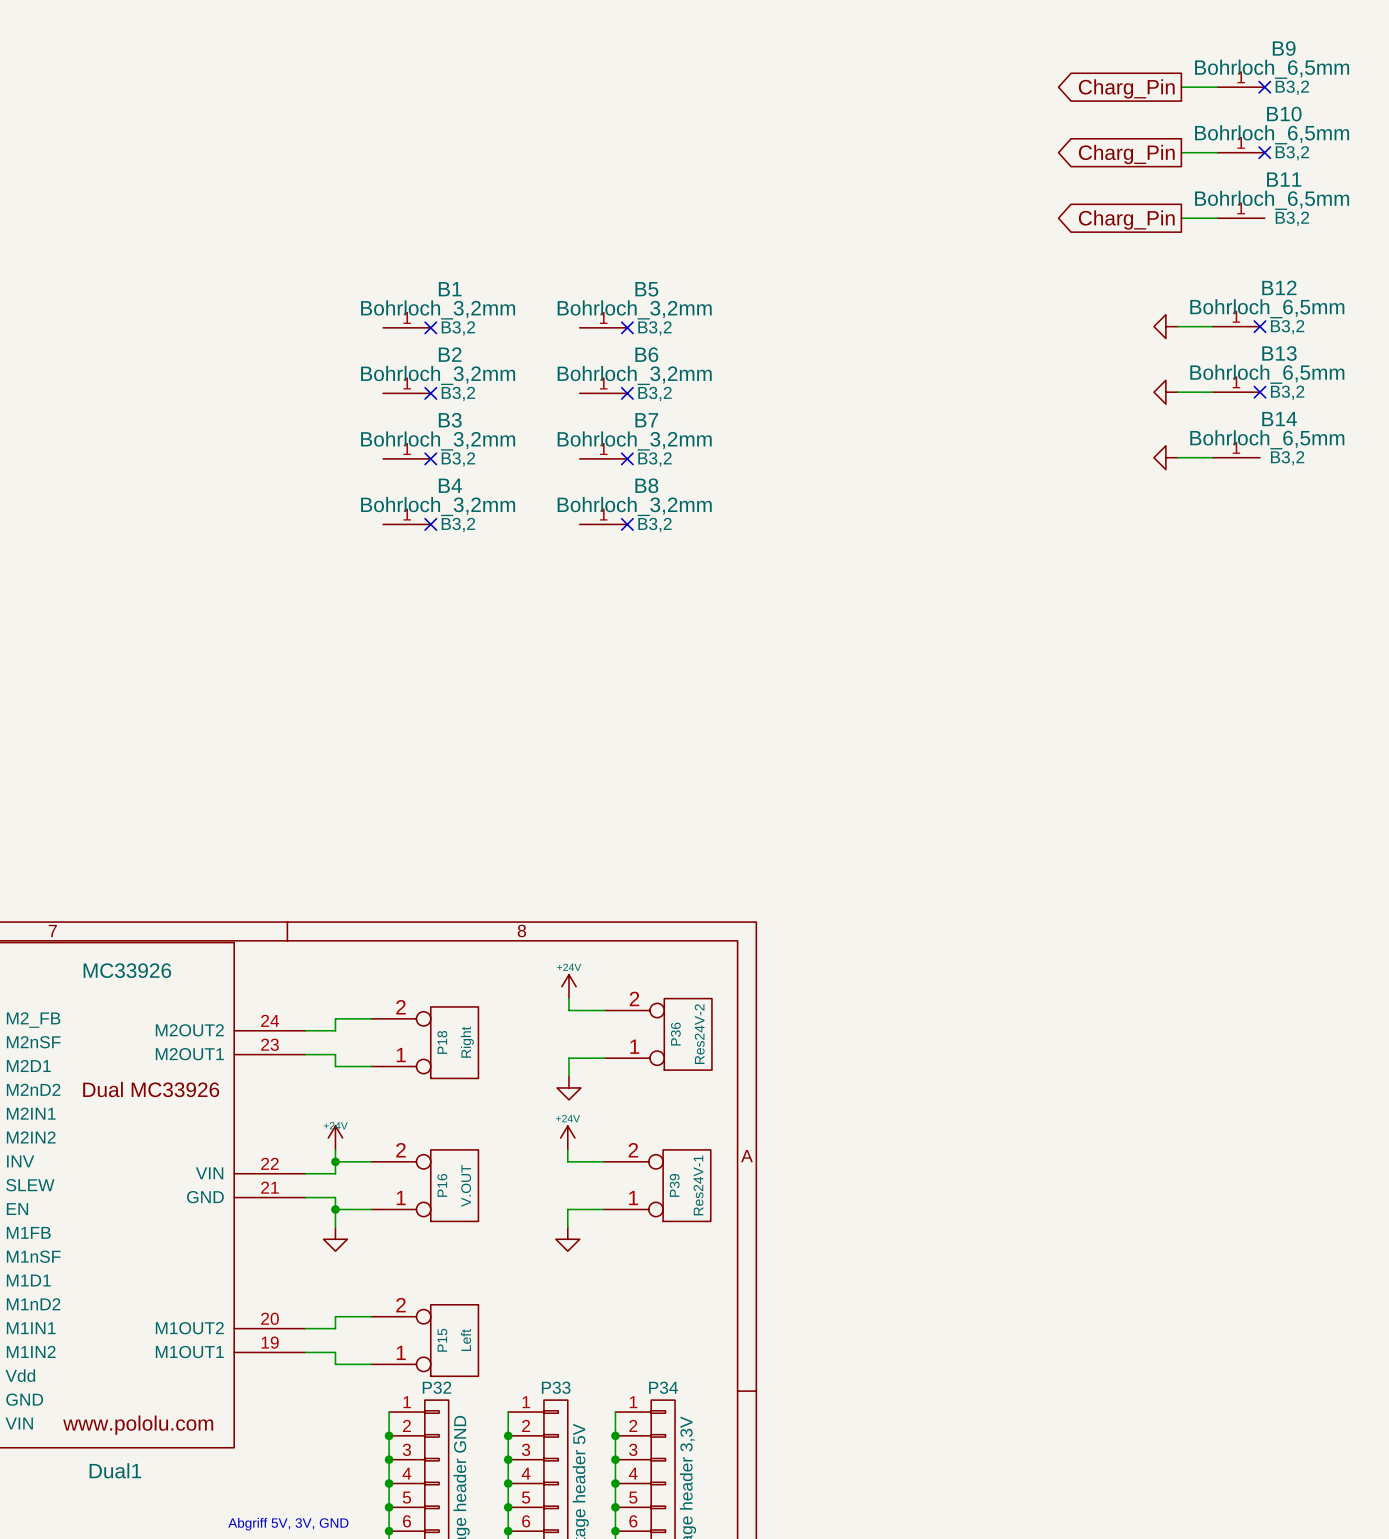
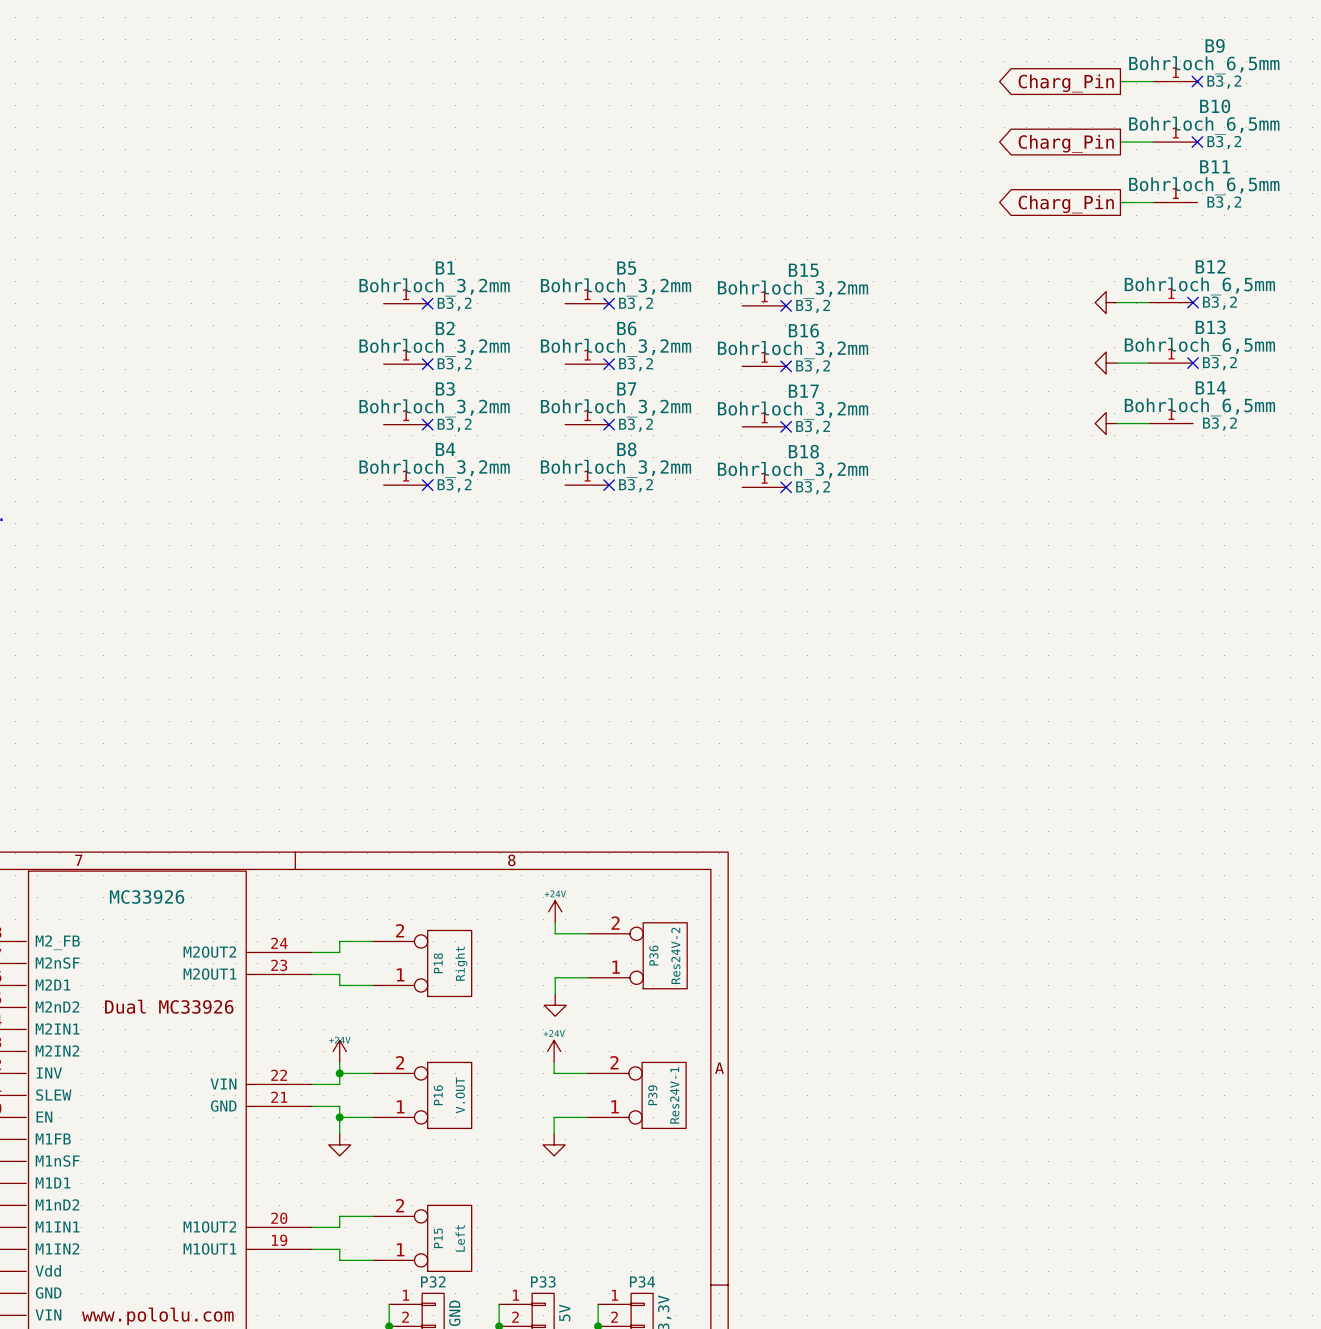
B15: none -> Bohrloch_3,2mm (764, 305)
no-connect mark: none -> (786, 305)
B16: none -> Bohrloch_3,2mm (764, 366)
no-connect mark: none -> (786, 366)
B17: none -> Bohrloch_3,2mm (764, 426)
no-connect mark: none -> (786, 426)
B18: none -> Bohrloch_3,2mm (764, 487)
no-connect mark: none -> (786, 487)

